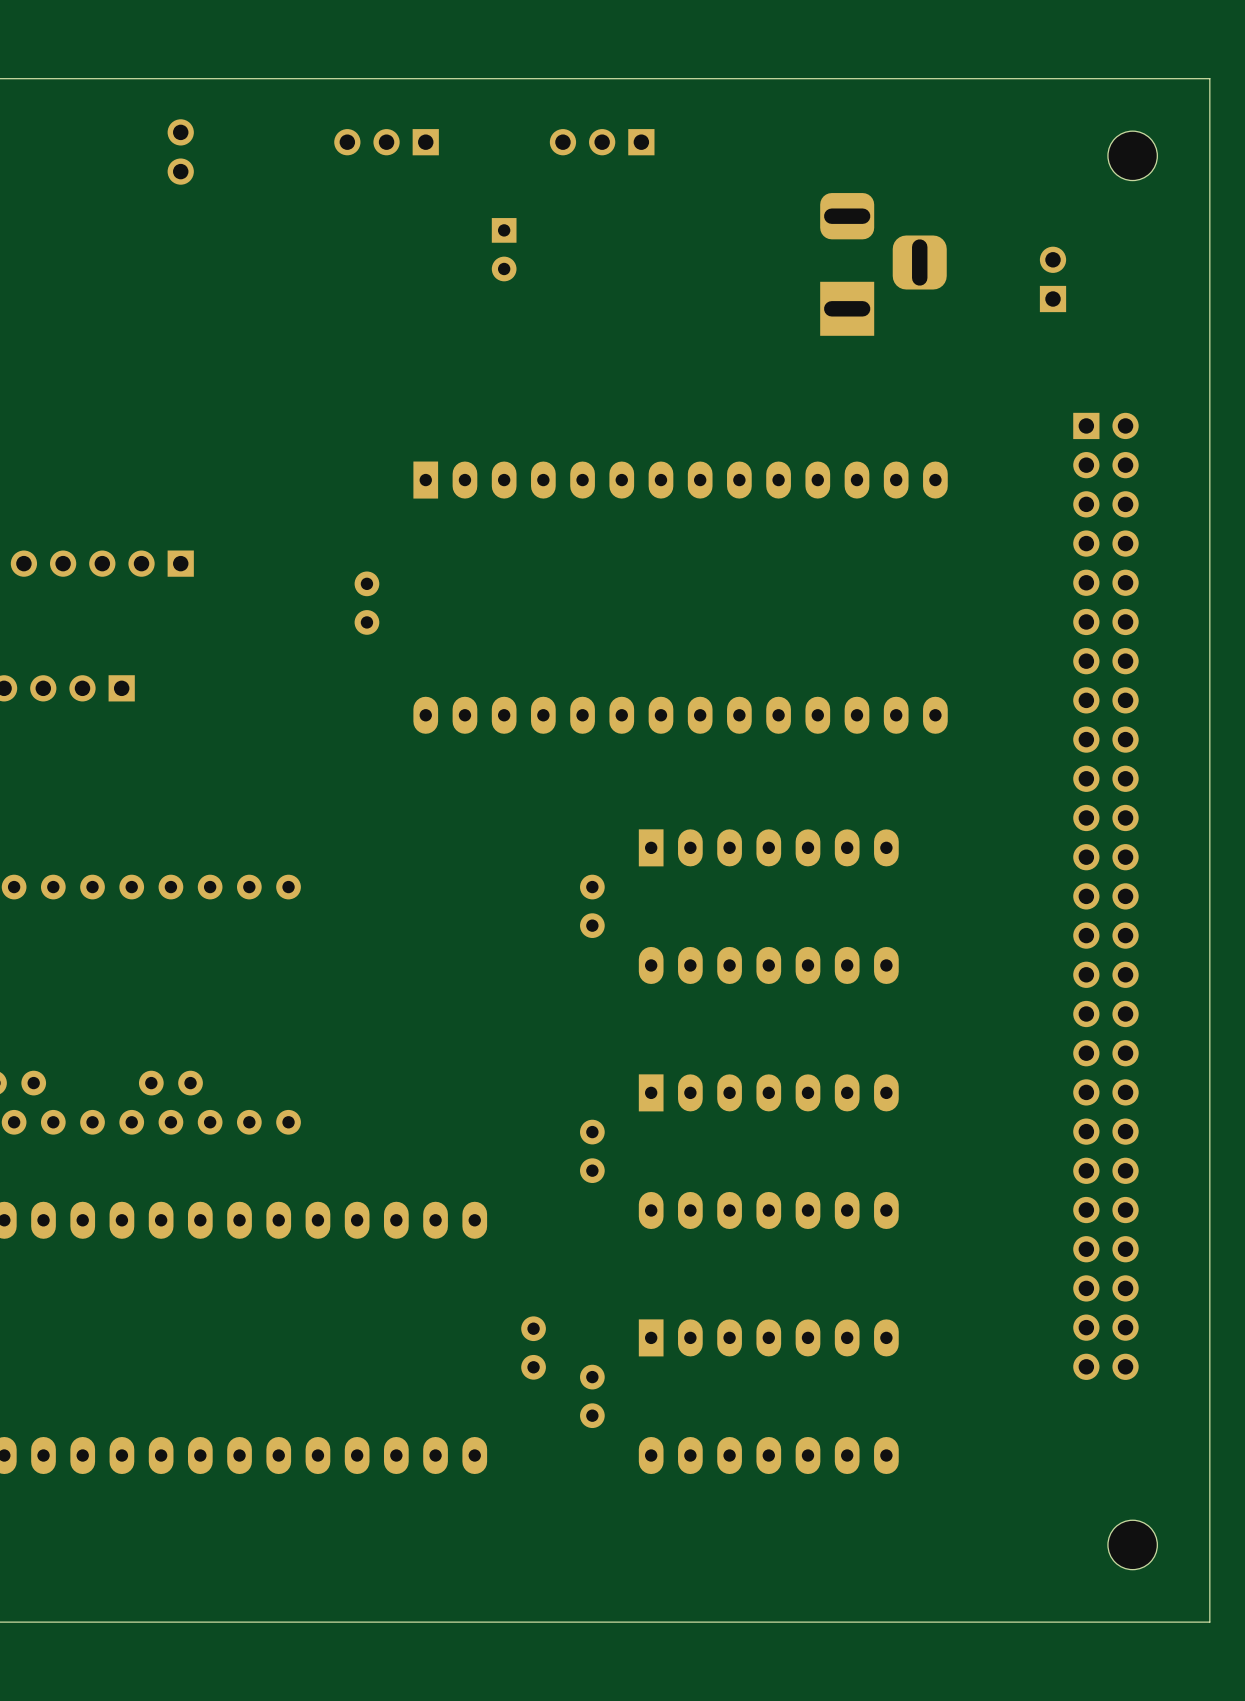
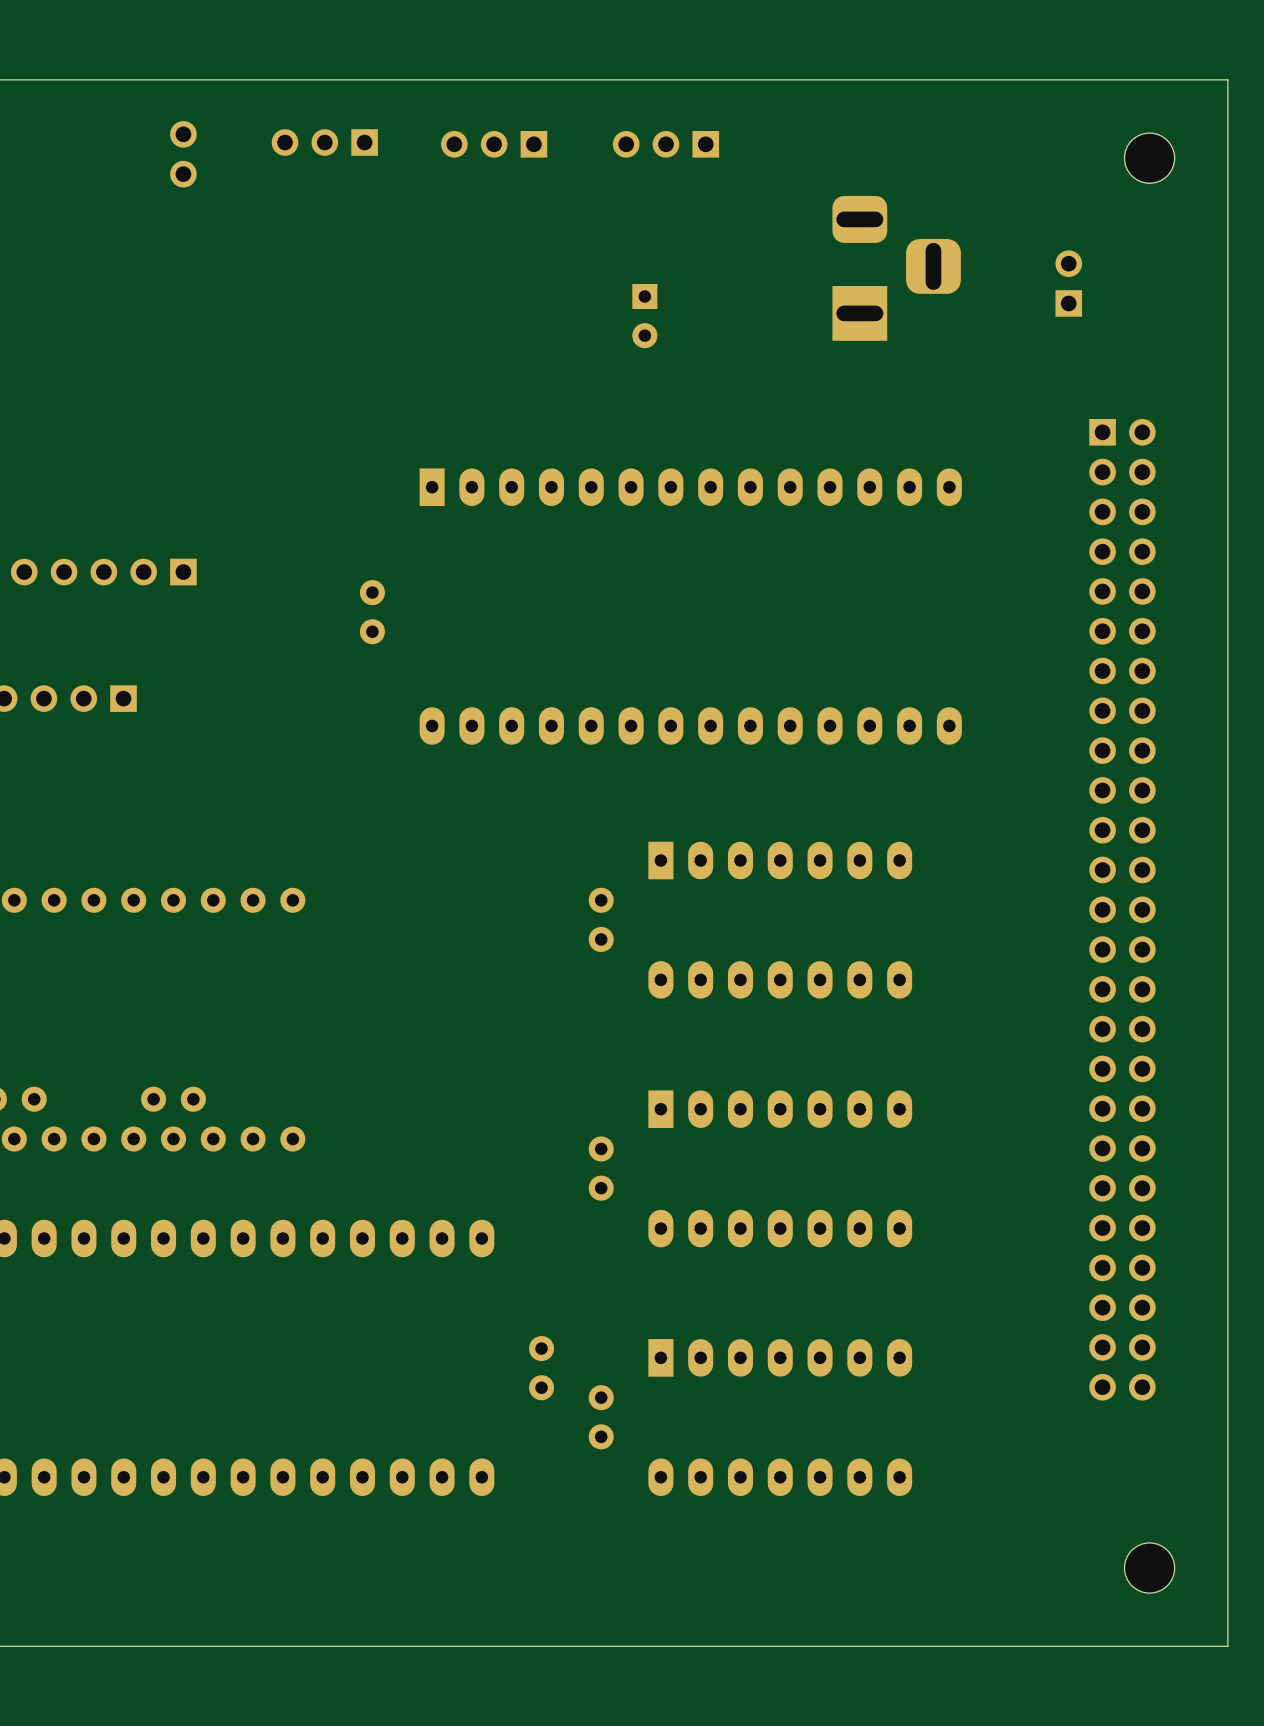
part: none -> (324, 142)
part: (386, 142) -> none
part: none -> (494, 144)
part position: (602, 142) -> (665, 144)
part position: (504, 249) -> (644, 316)

